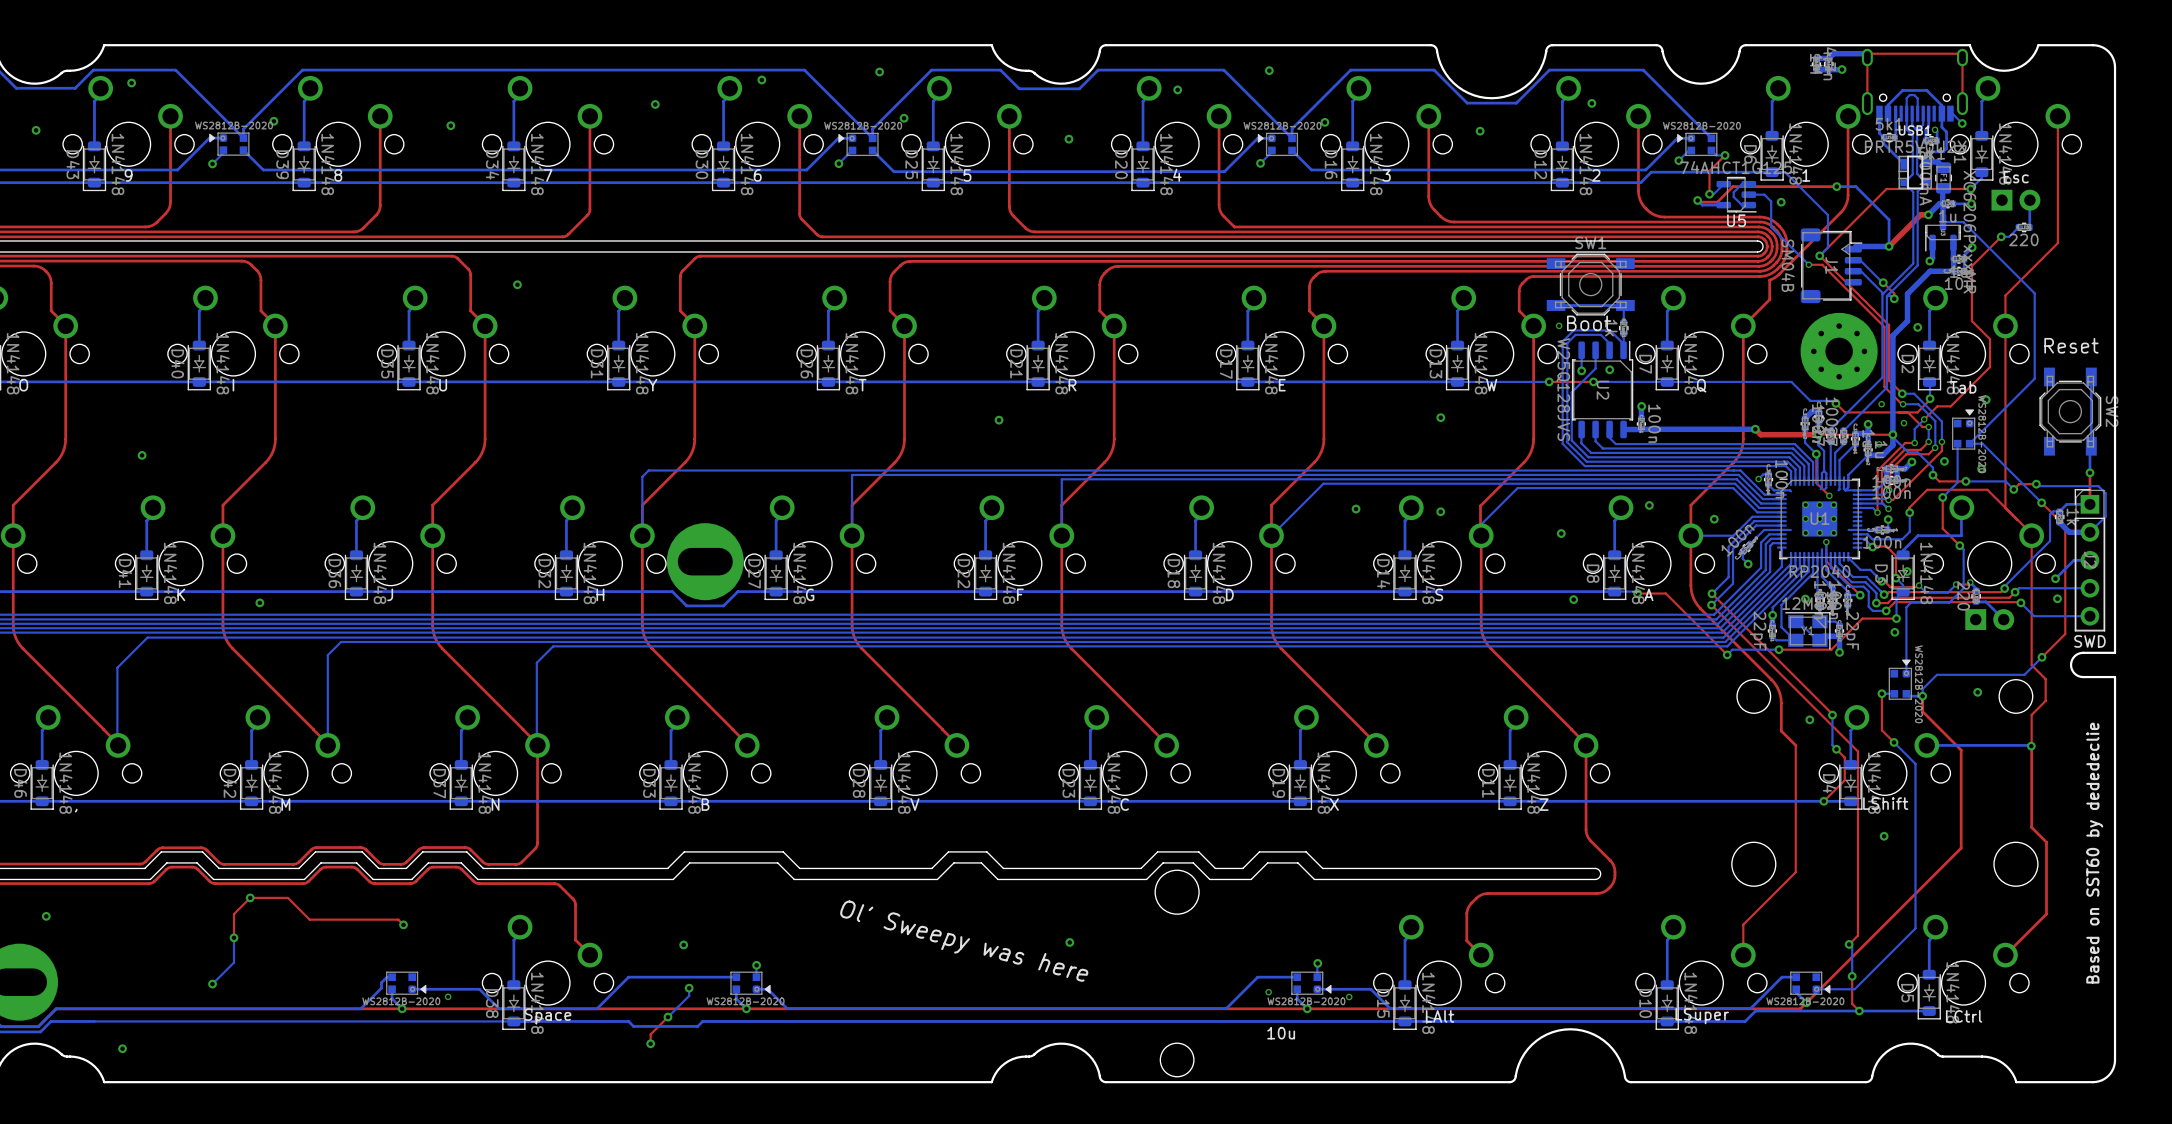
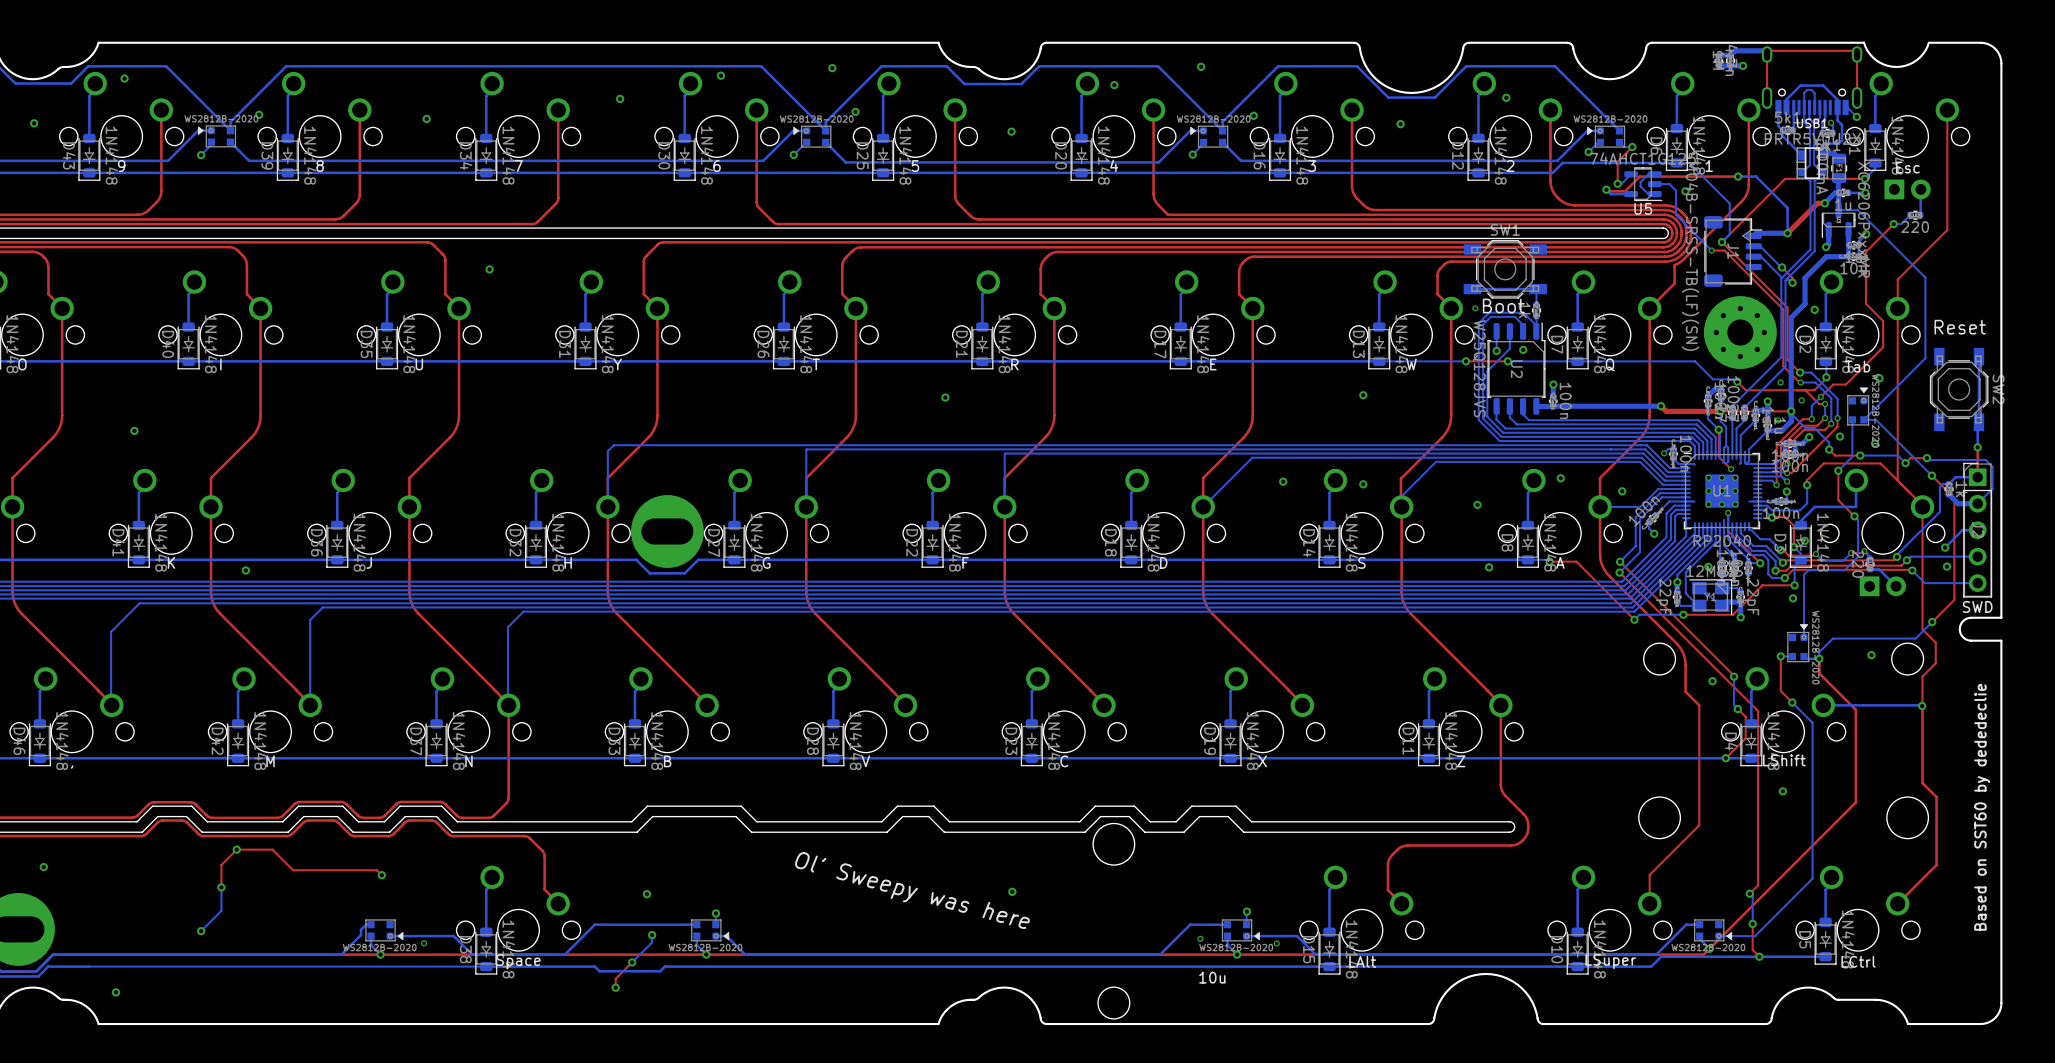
J1 value: SM04B (1788, 265) -> SM04B-SRSS-TB(LF)(SN) (1690, 251)

